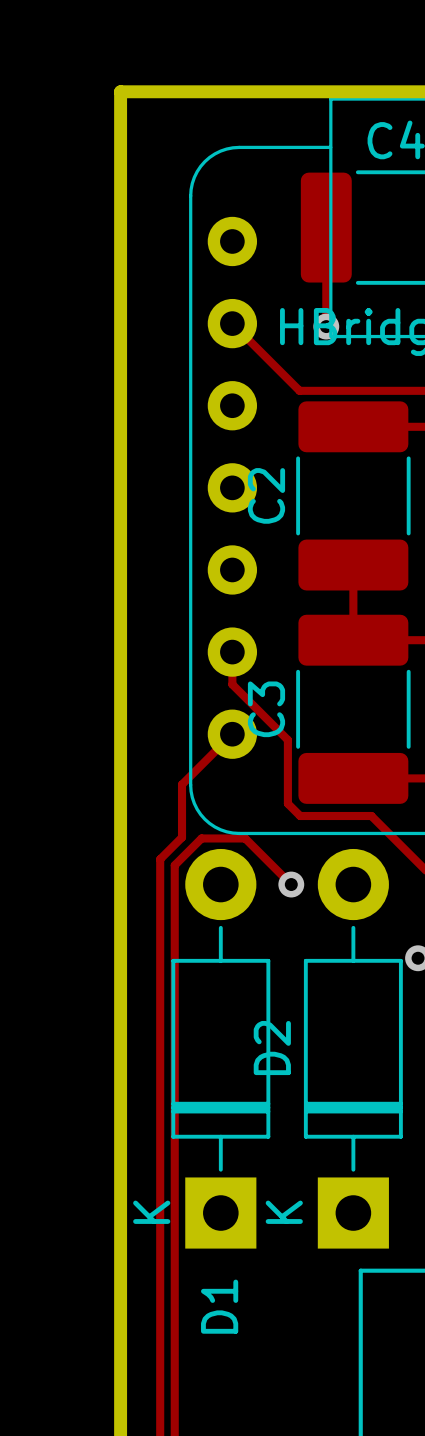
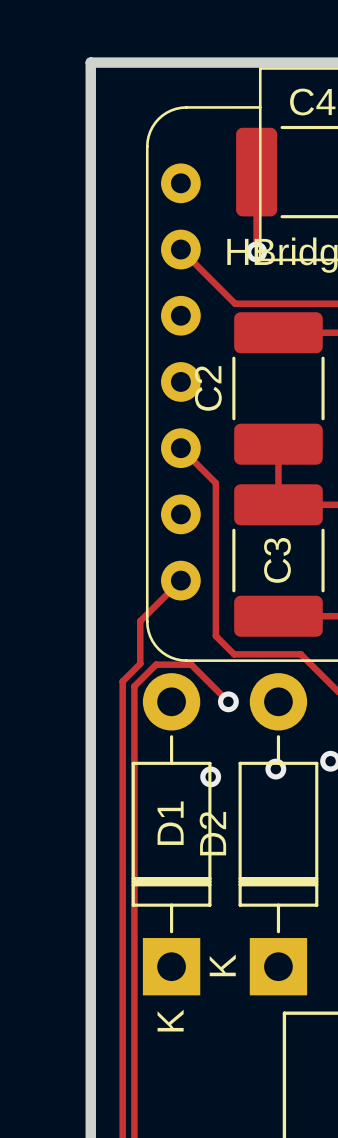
track: (232, 652) (232, 684) (287, 740) (287, 803) (300, 815) (371, 815) (381, 825) -> (180, 448) (215, 483) (215, 636) (234, 654) (300, 654)
C3 name position: C3 (266, 709) -> C3 (277, 560)
via: none -> (275, 769)
via: none -> (210, 776)
D1 text position: K (151, 1212) -> K (170, 1020)
D1 name position: D1 (219, 1306) -> D1 (170, 823)

